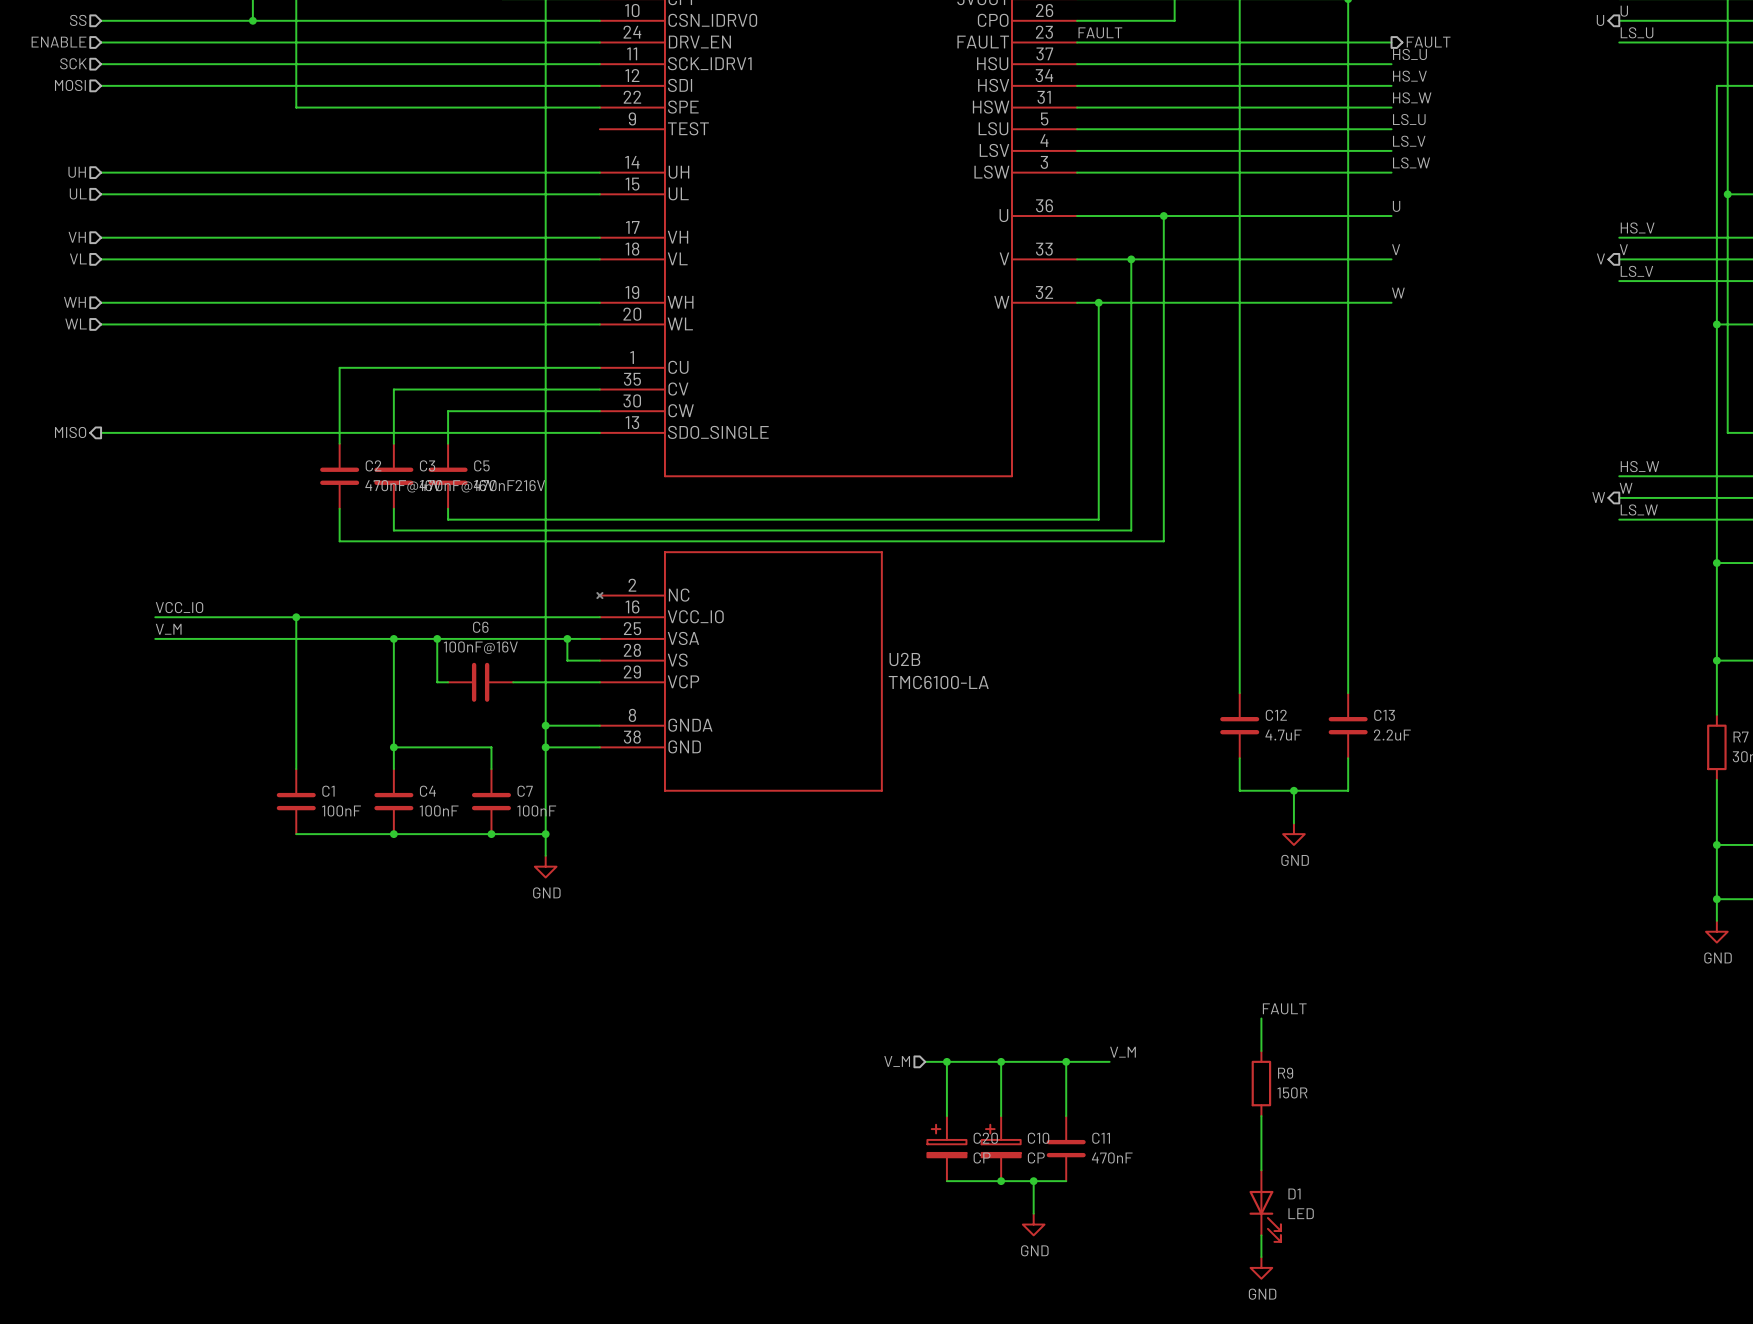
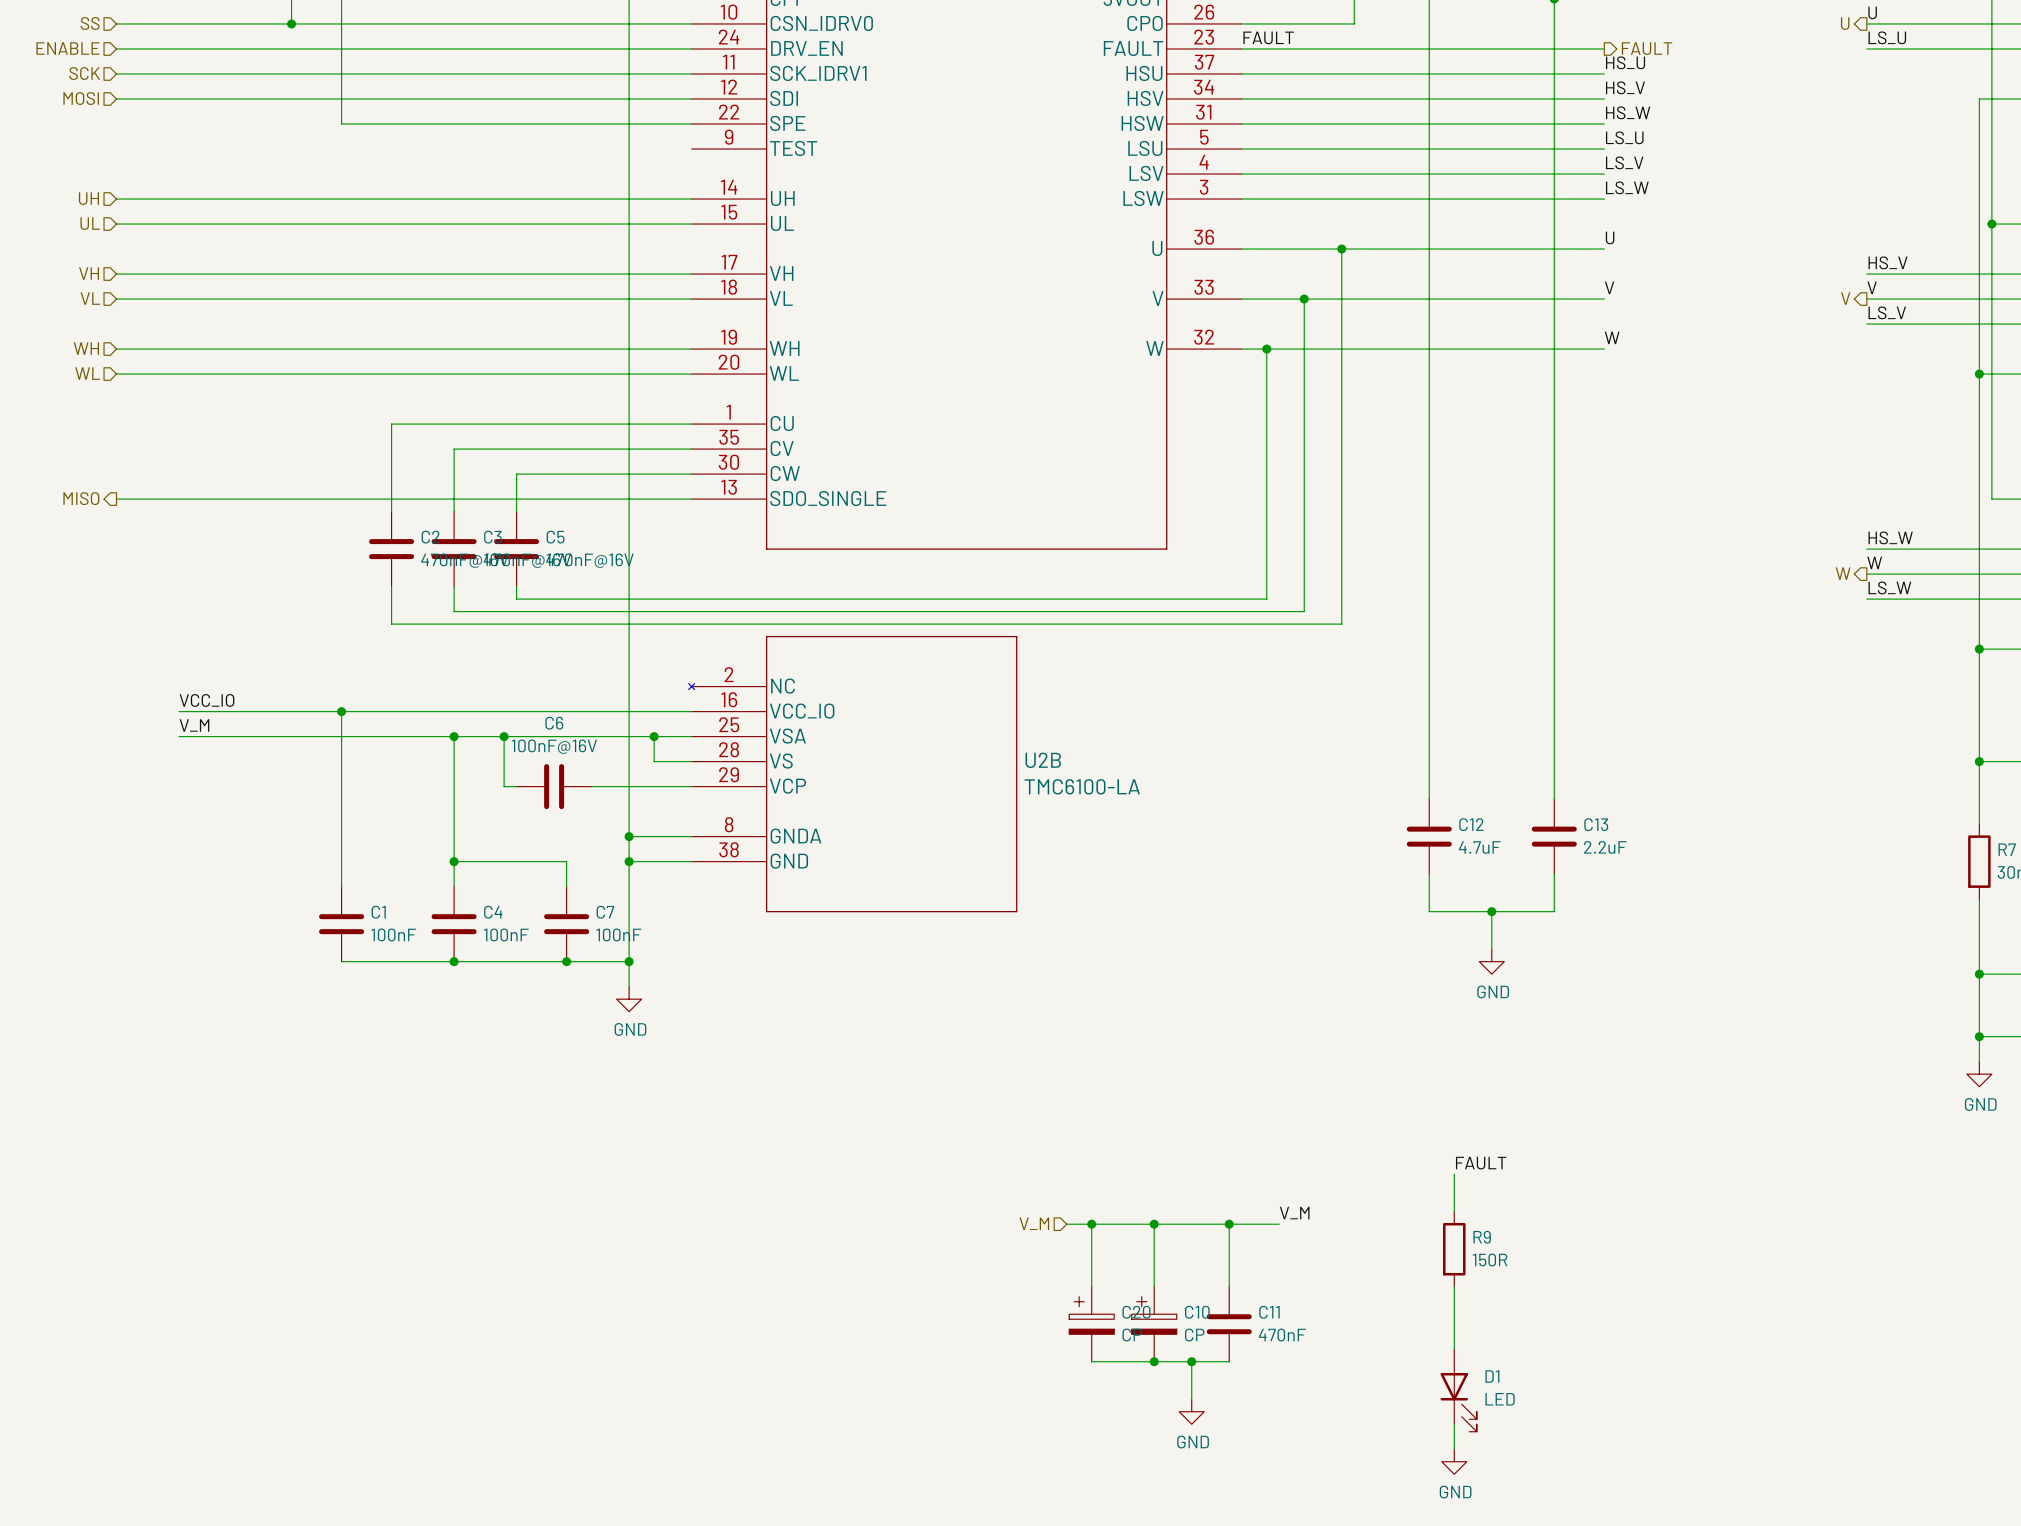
C5 value: 470nF216V (509, 485) -> 470nF@16V (589, 560)

